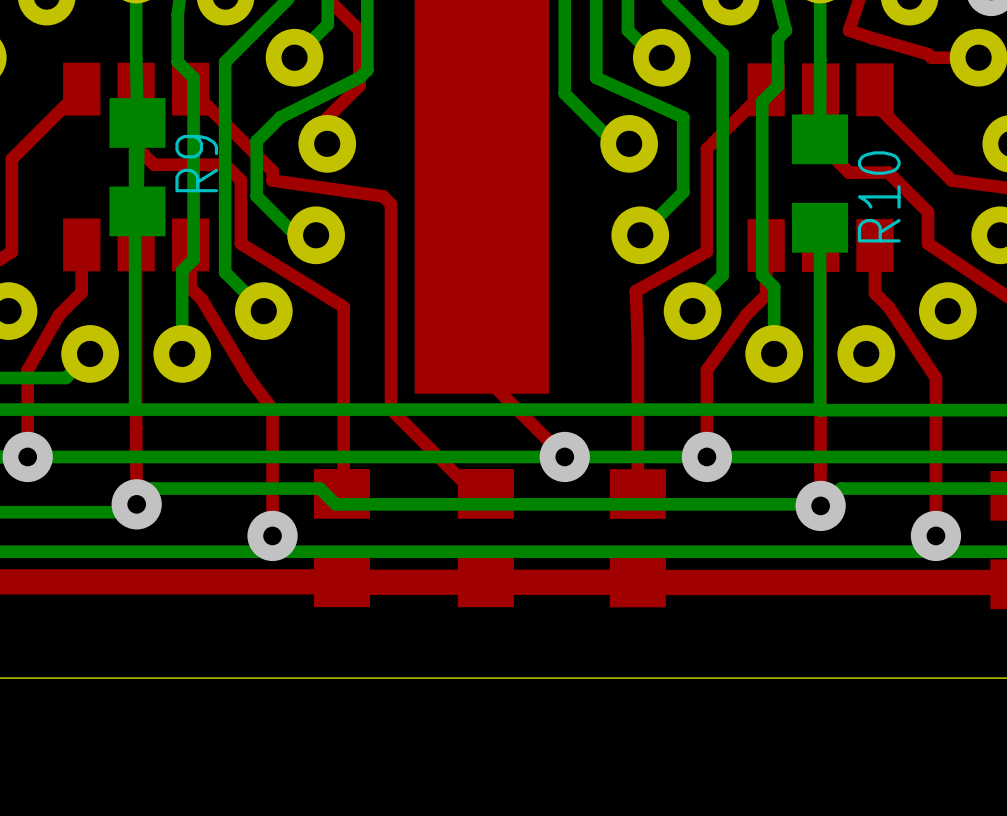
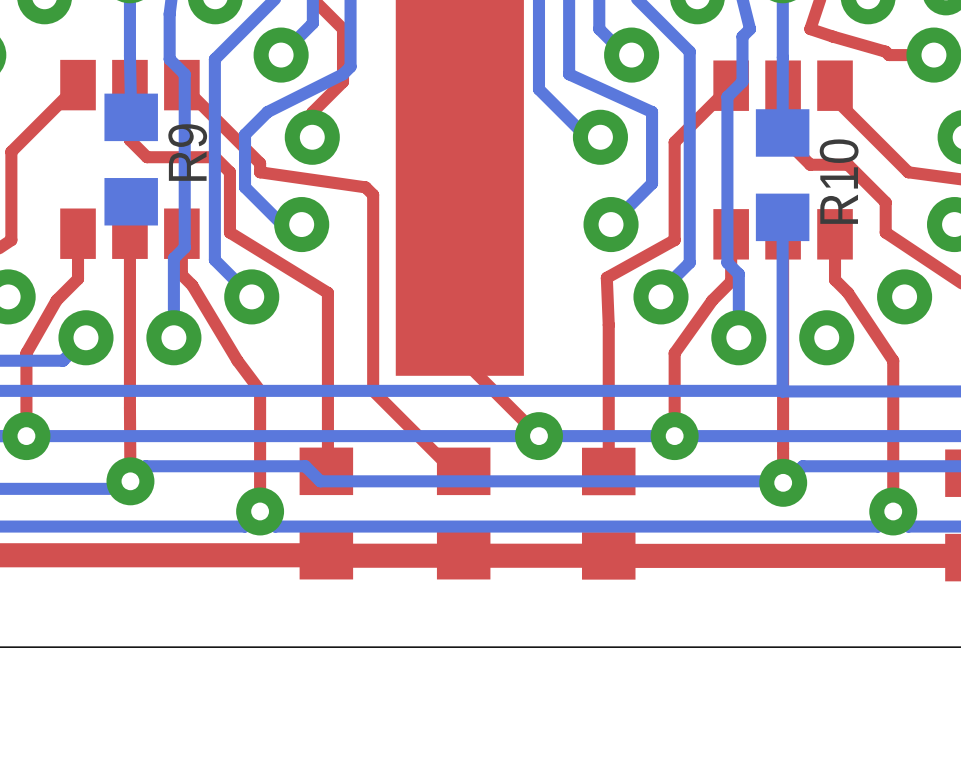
bottom track: (138, 149) (137, 211) (135, 150) (135, 409) -> none

